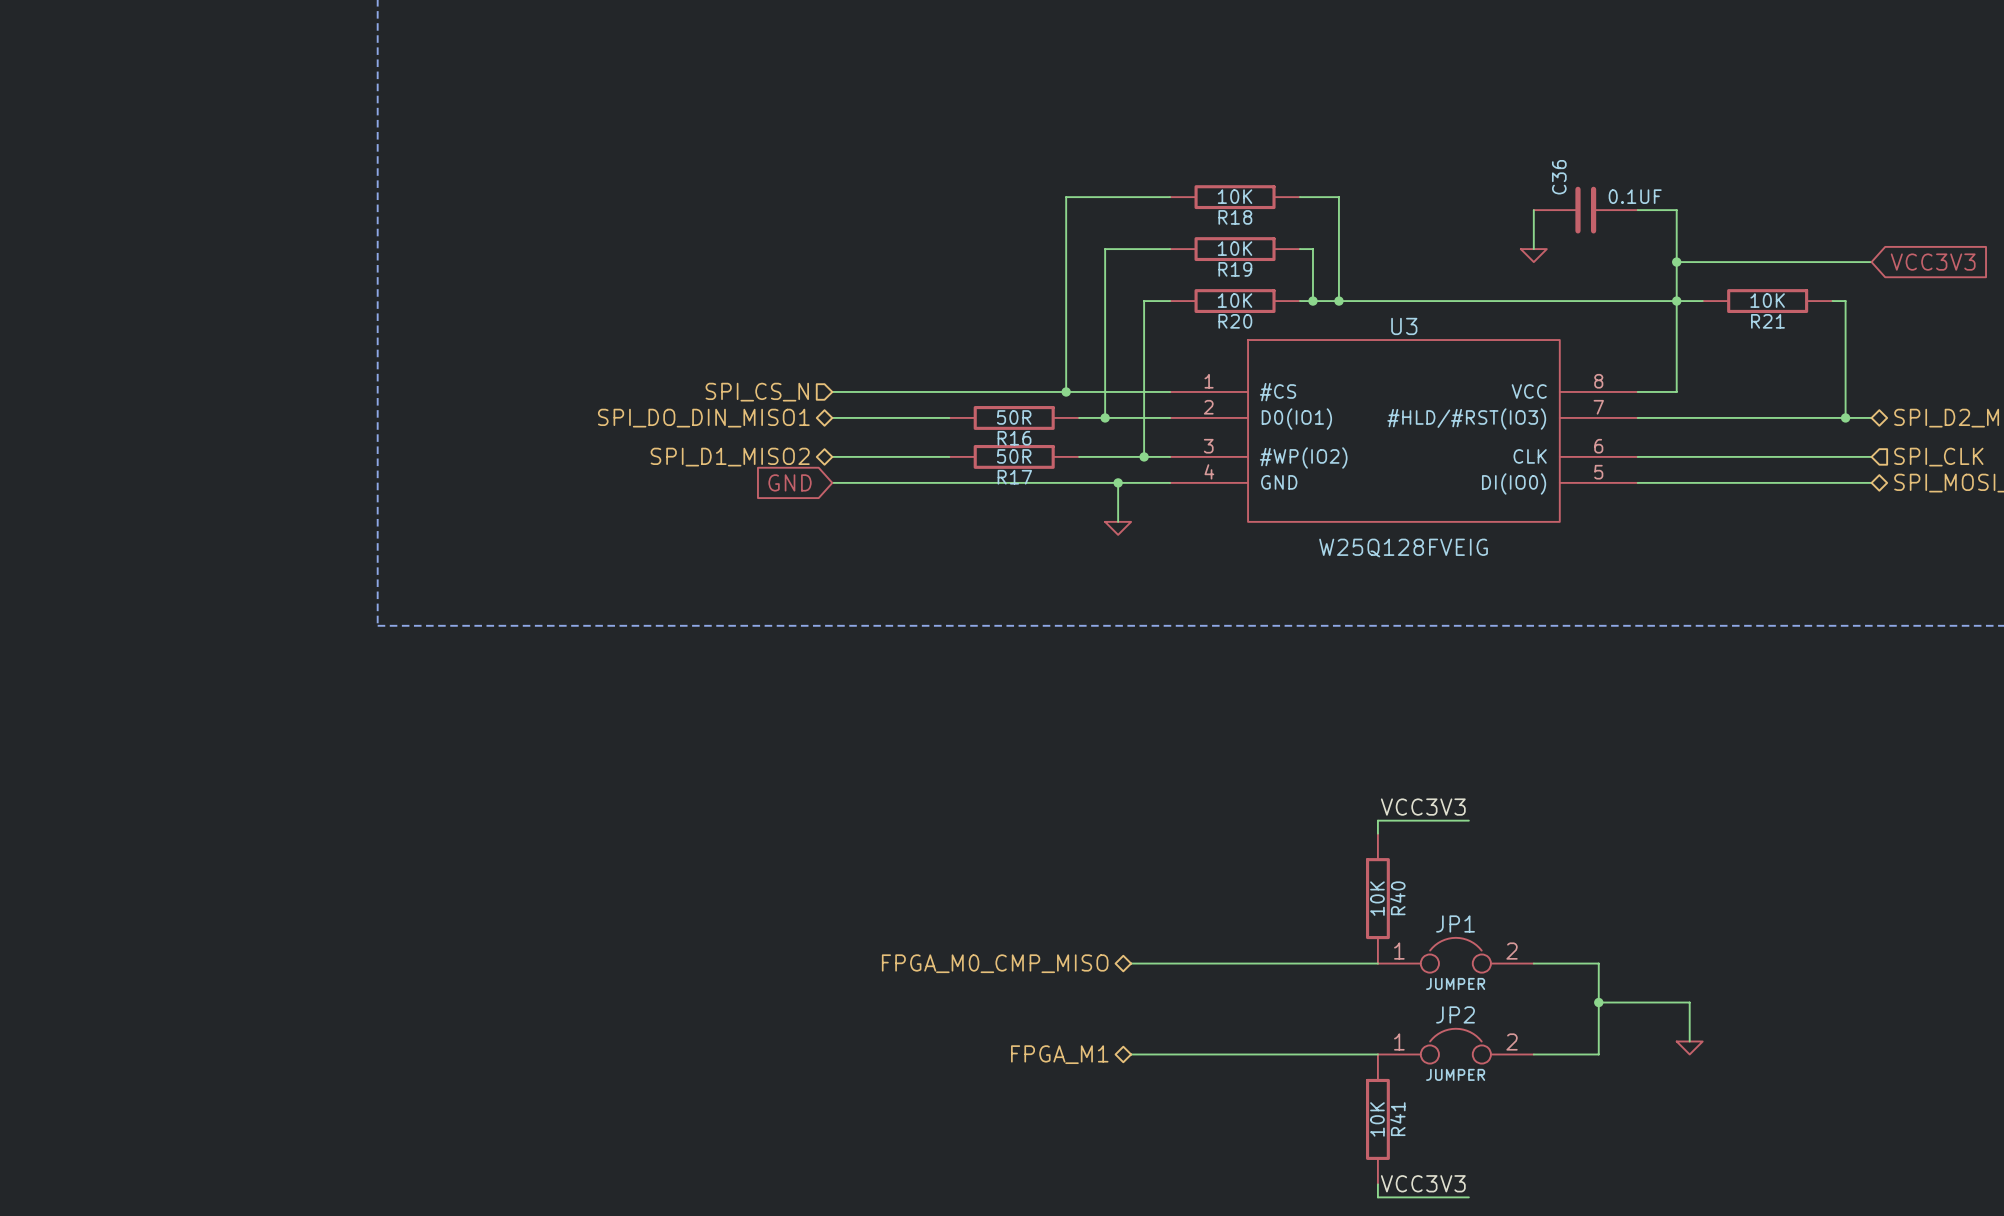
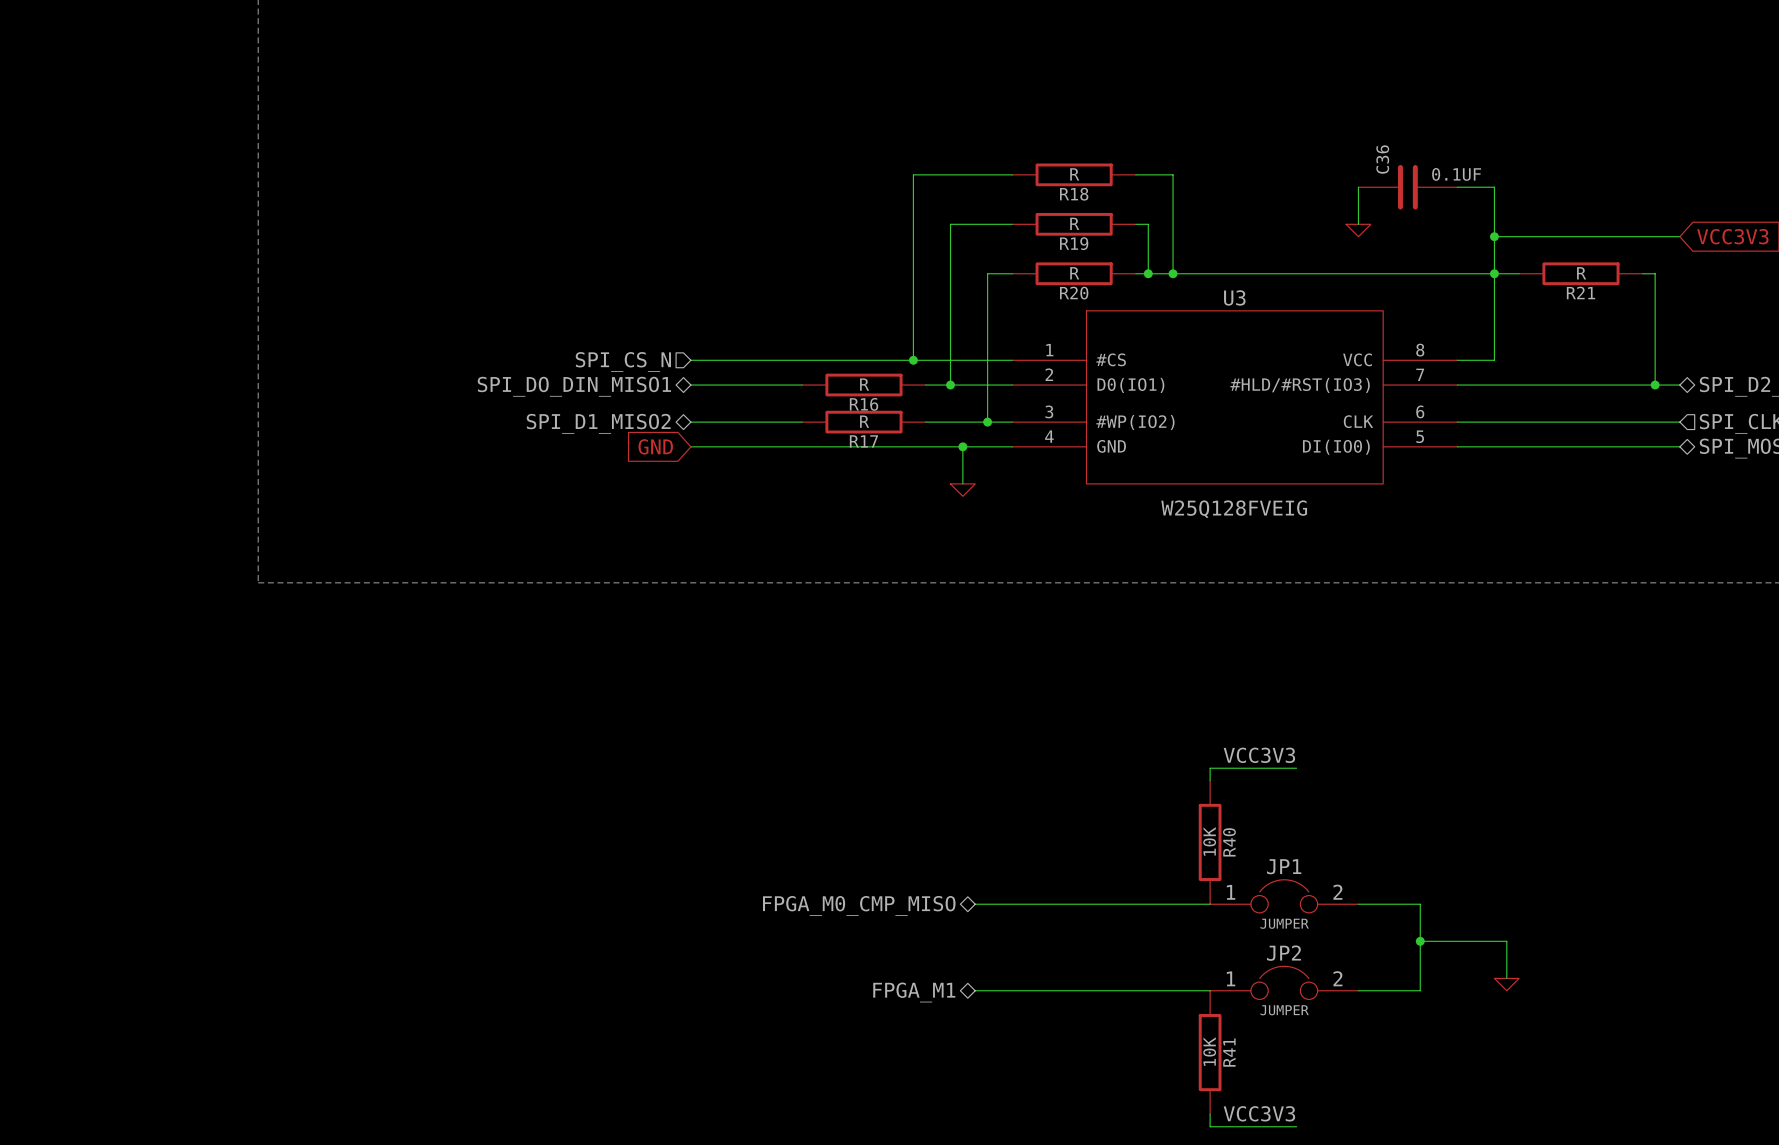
R18 value: 10K (1235, 196) -> R (1074, 174)
R19 value: 10K (1235, 248) -> R (1074, 223)
R20 value: 10K (1235, 300) -> R (1074, 273)
R21 value: 10K (1767, 300) -> R (1581, 273)
R16 value: 50R (1014, 417) -> R (864, 384)
R17 value: 50R (1014, 456) -> R (864, 421)

